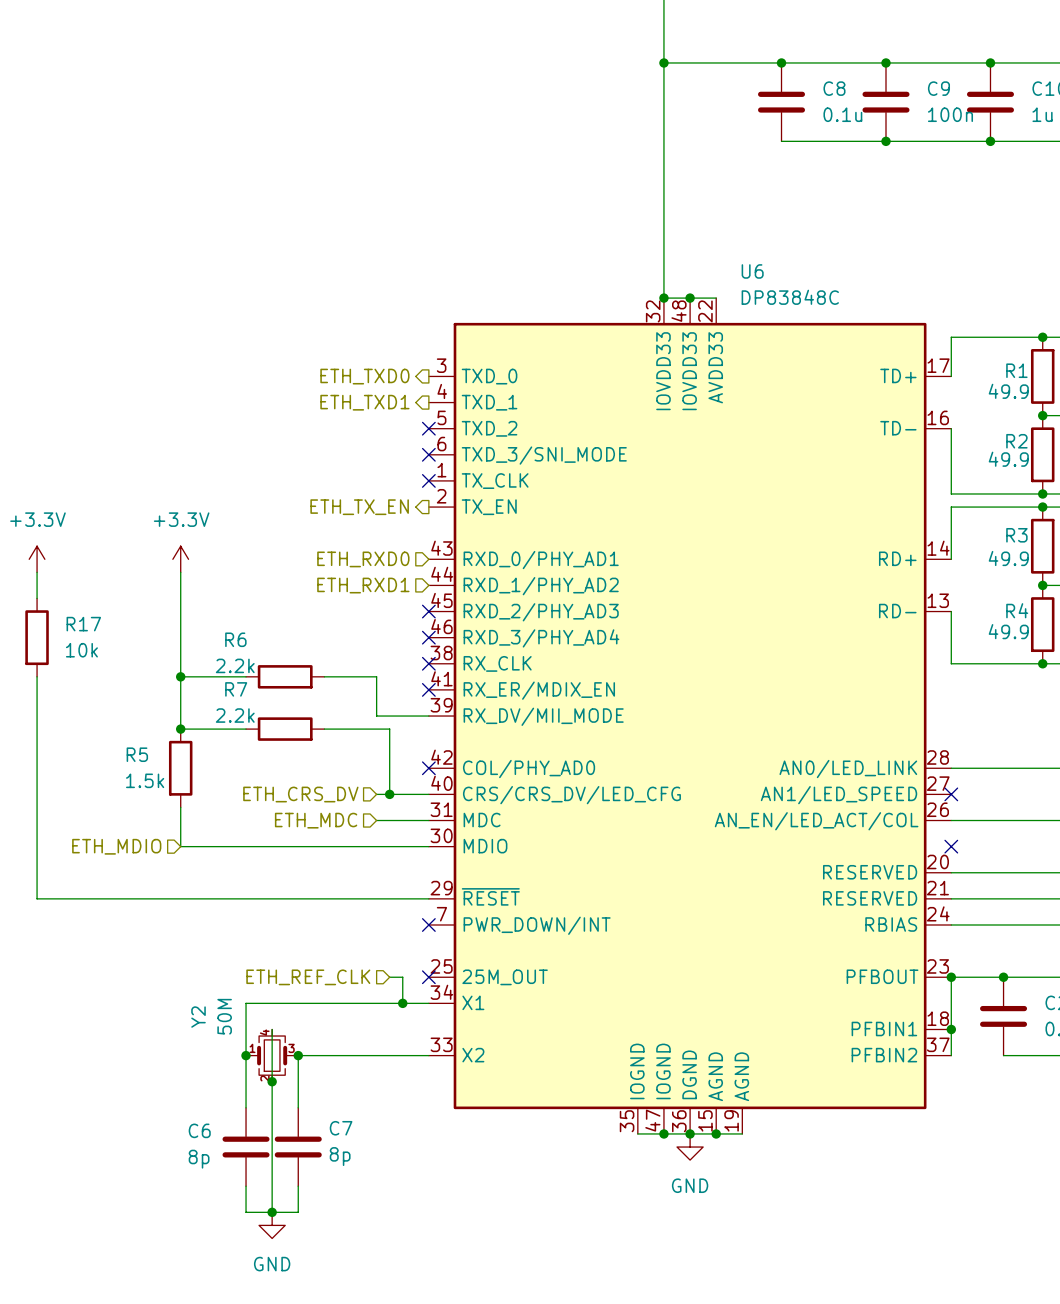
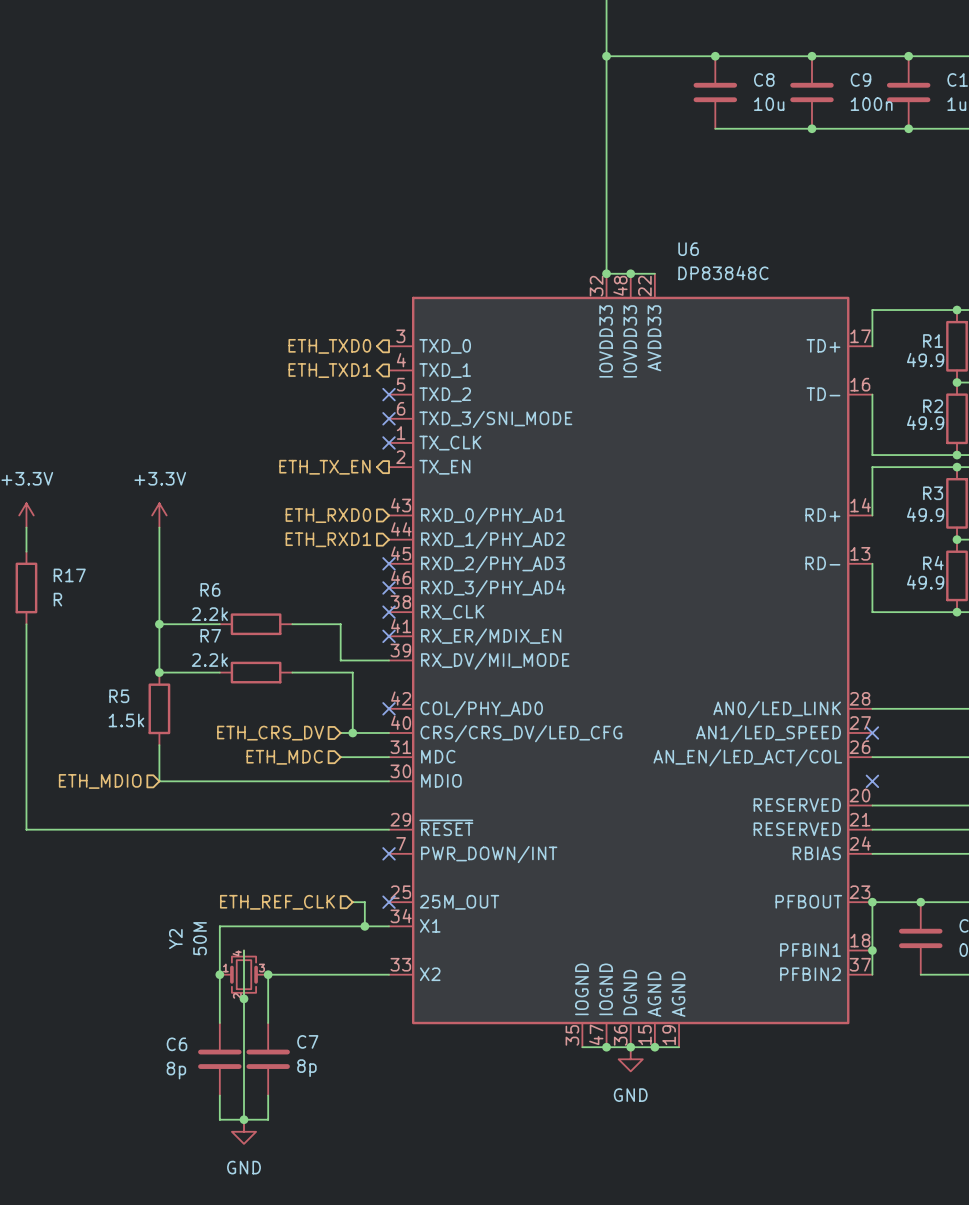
C8 value: 0.1u (842, 114) -> 10u (769, 104)
R17 value: 10k (81, 650) -> R (57, 599)

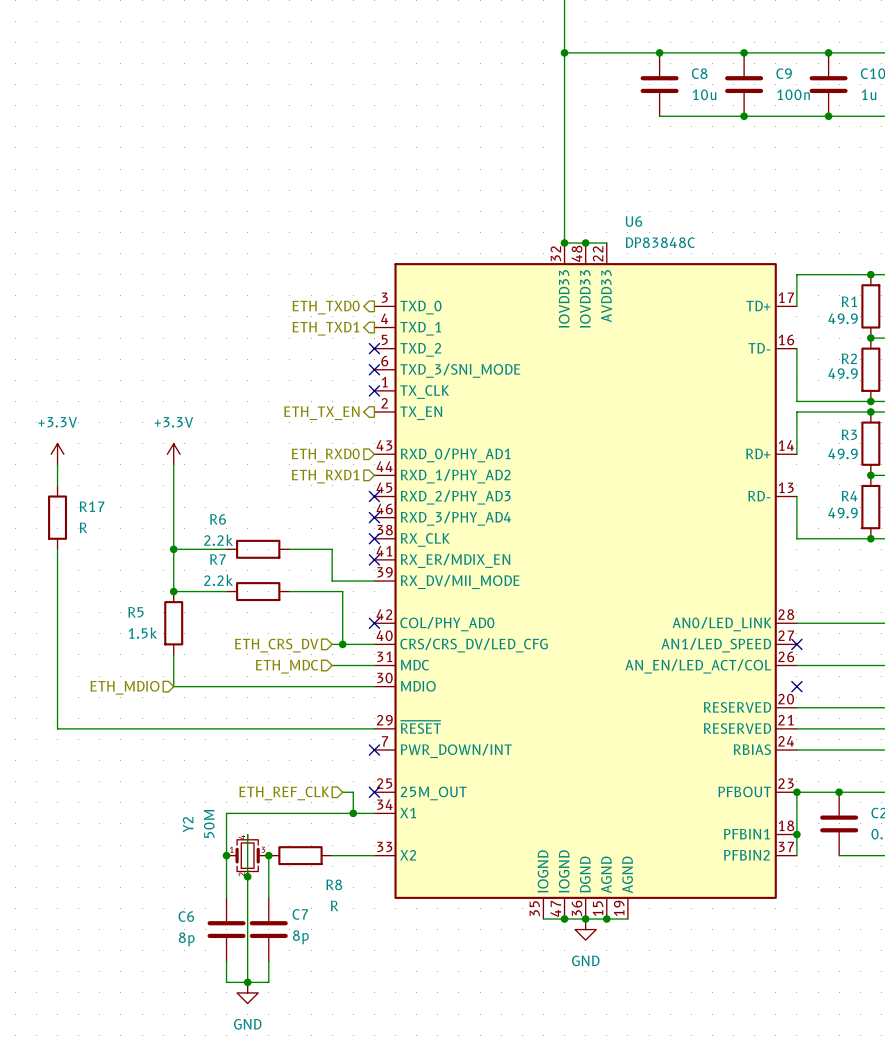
wire: (268, 974) (340, 974) -> none
R8: none -> R (300, 855)

